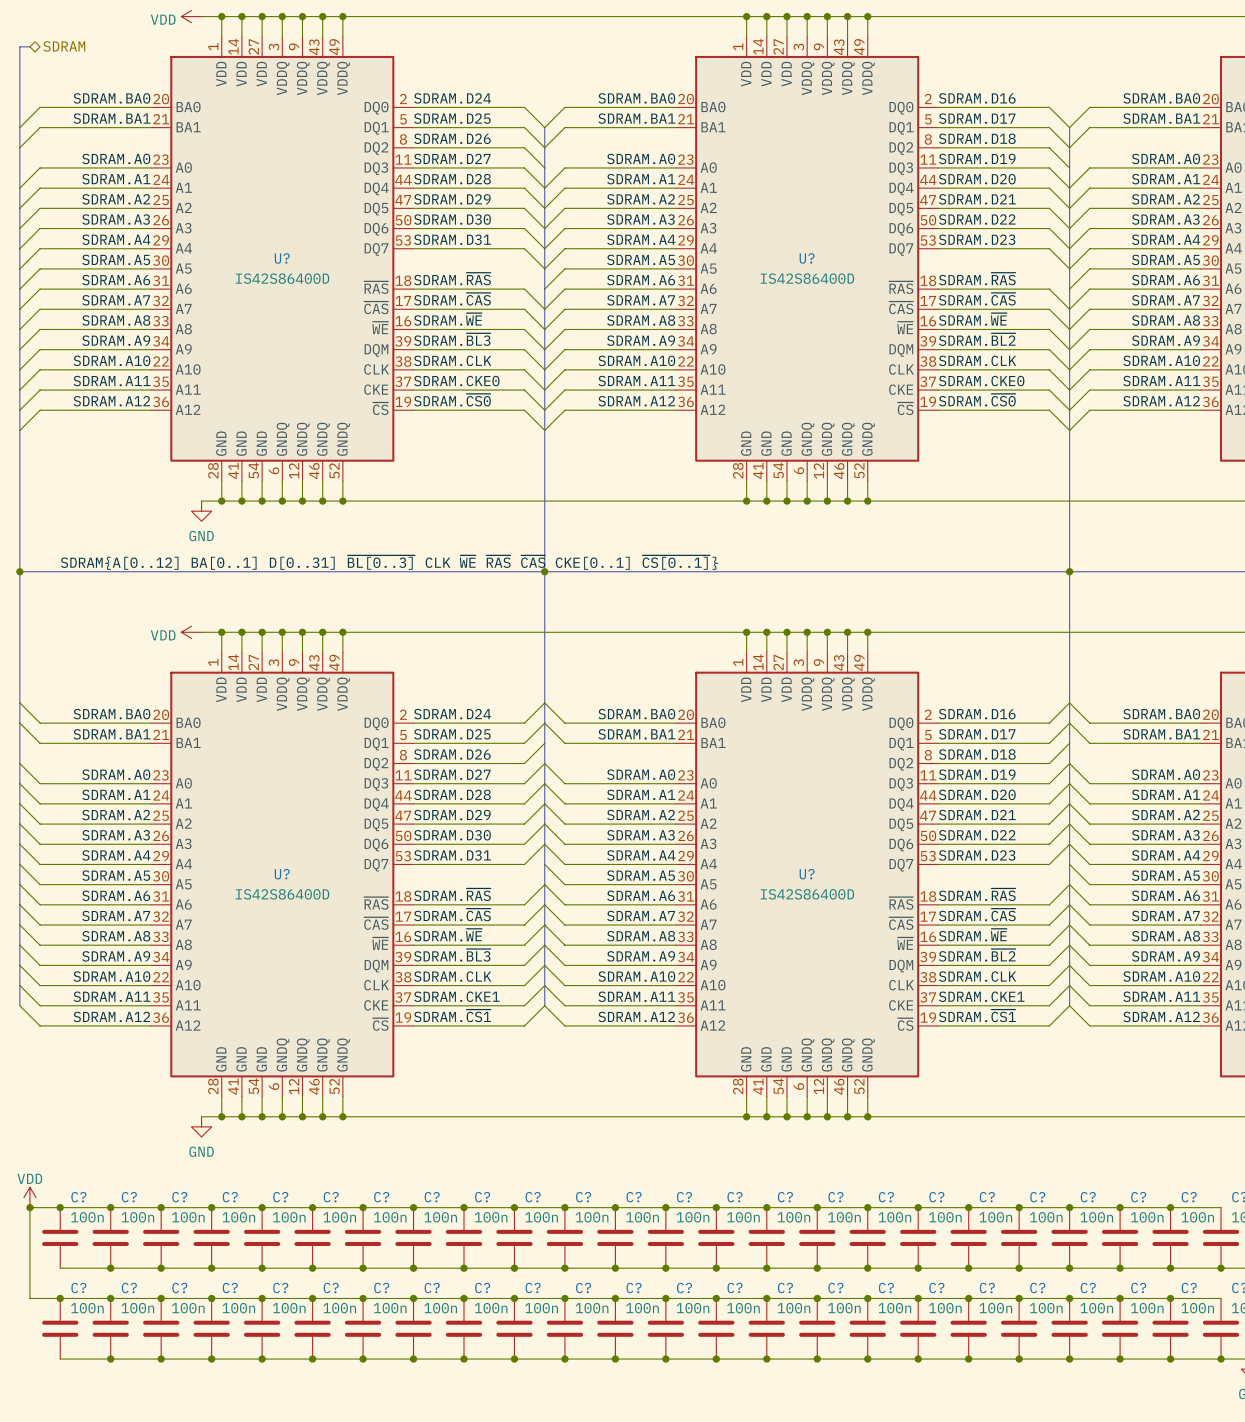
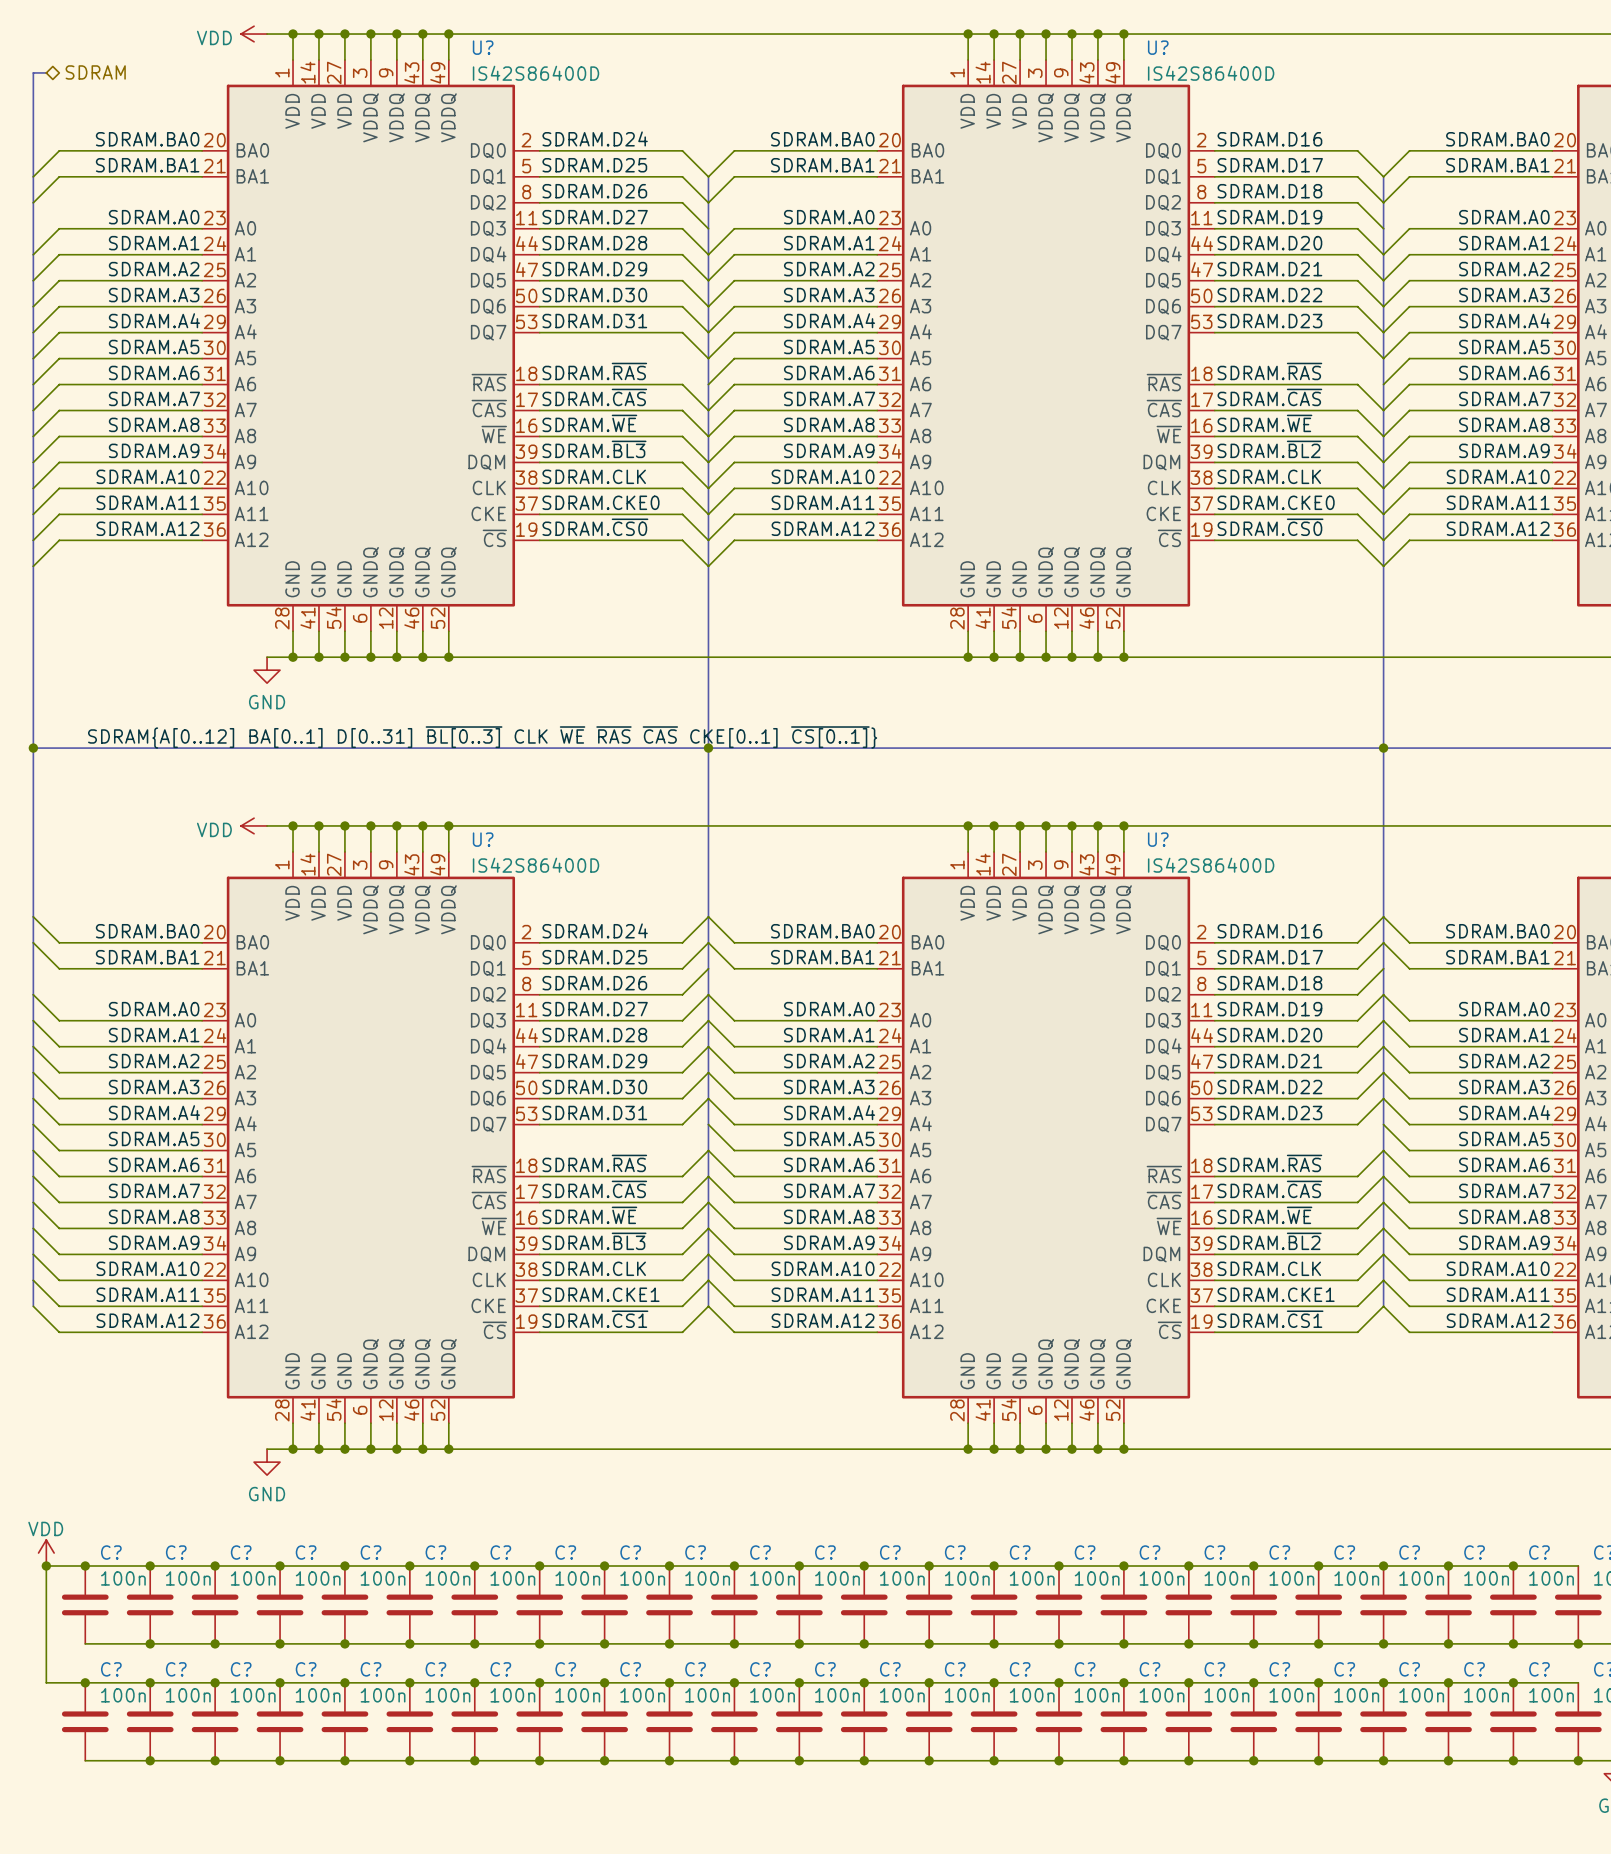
U? name position: U? (282, 258) -> U? (483, 47)
U? name position: U? (807, 258) -> U? (1158, 47)
U? value position: IS42S86400D (282, 278) -> IS42S86400D (536, 73)
U? value position: IS42S86400D (807, 278) -> IS42S86400D (1211, 73)
U? name position: U? (282, 874) -> U? (483, 839)
U? name position: U? (807, 874) -> U? (1158, 839)
U? value position: IS42S86400D (282, 894) -> IS42S86400D (536, 865)
U? value position: IS42S86400D (807, 894) -> IS42S86400D (1211, 865)

